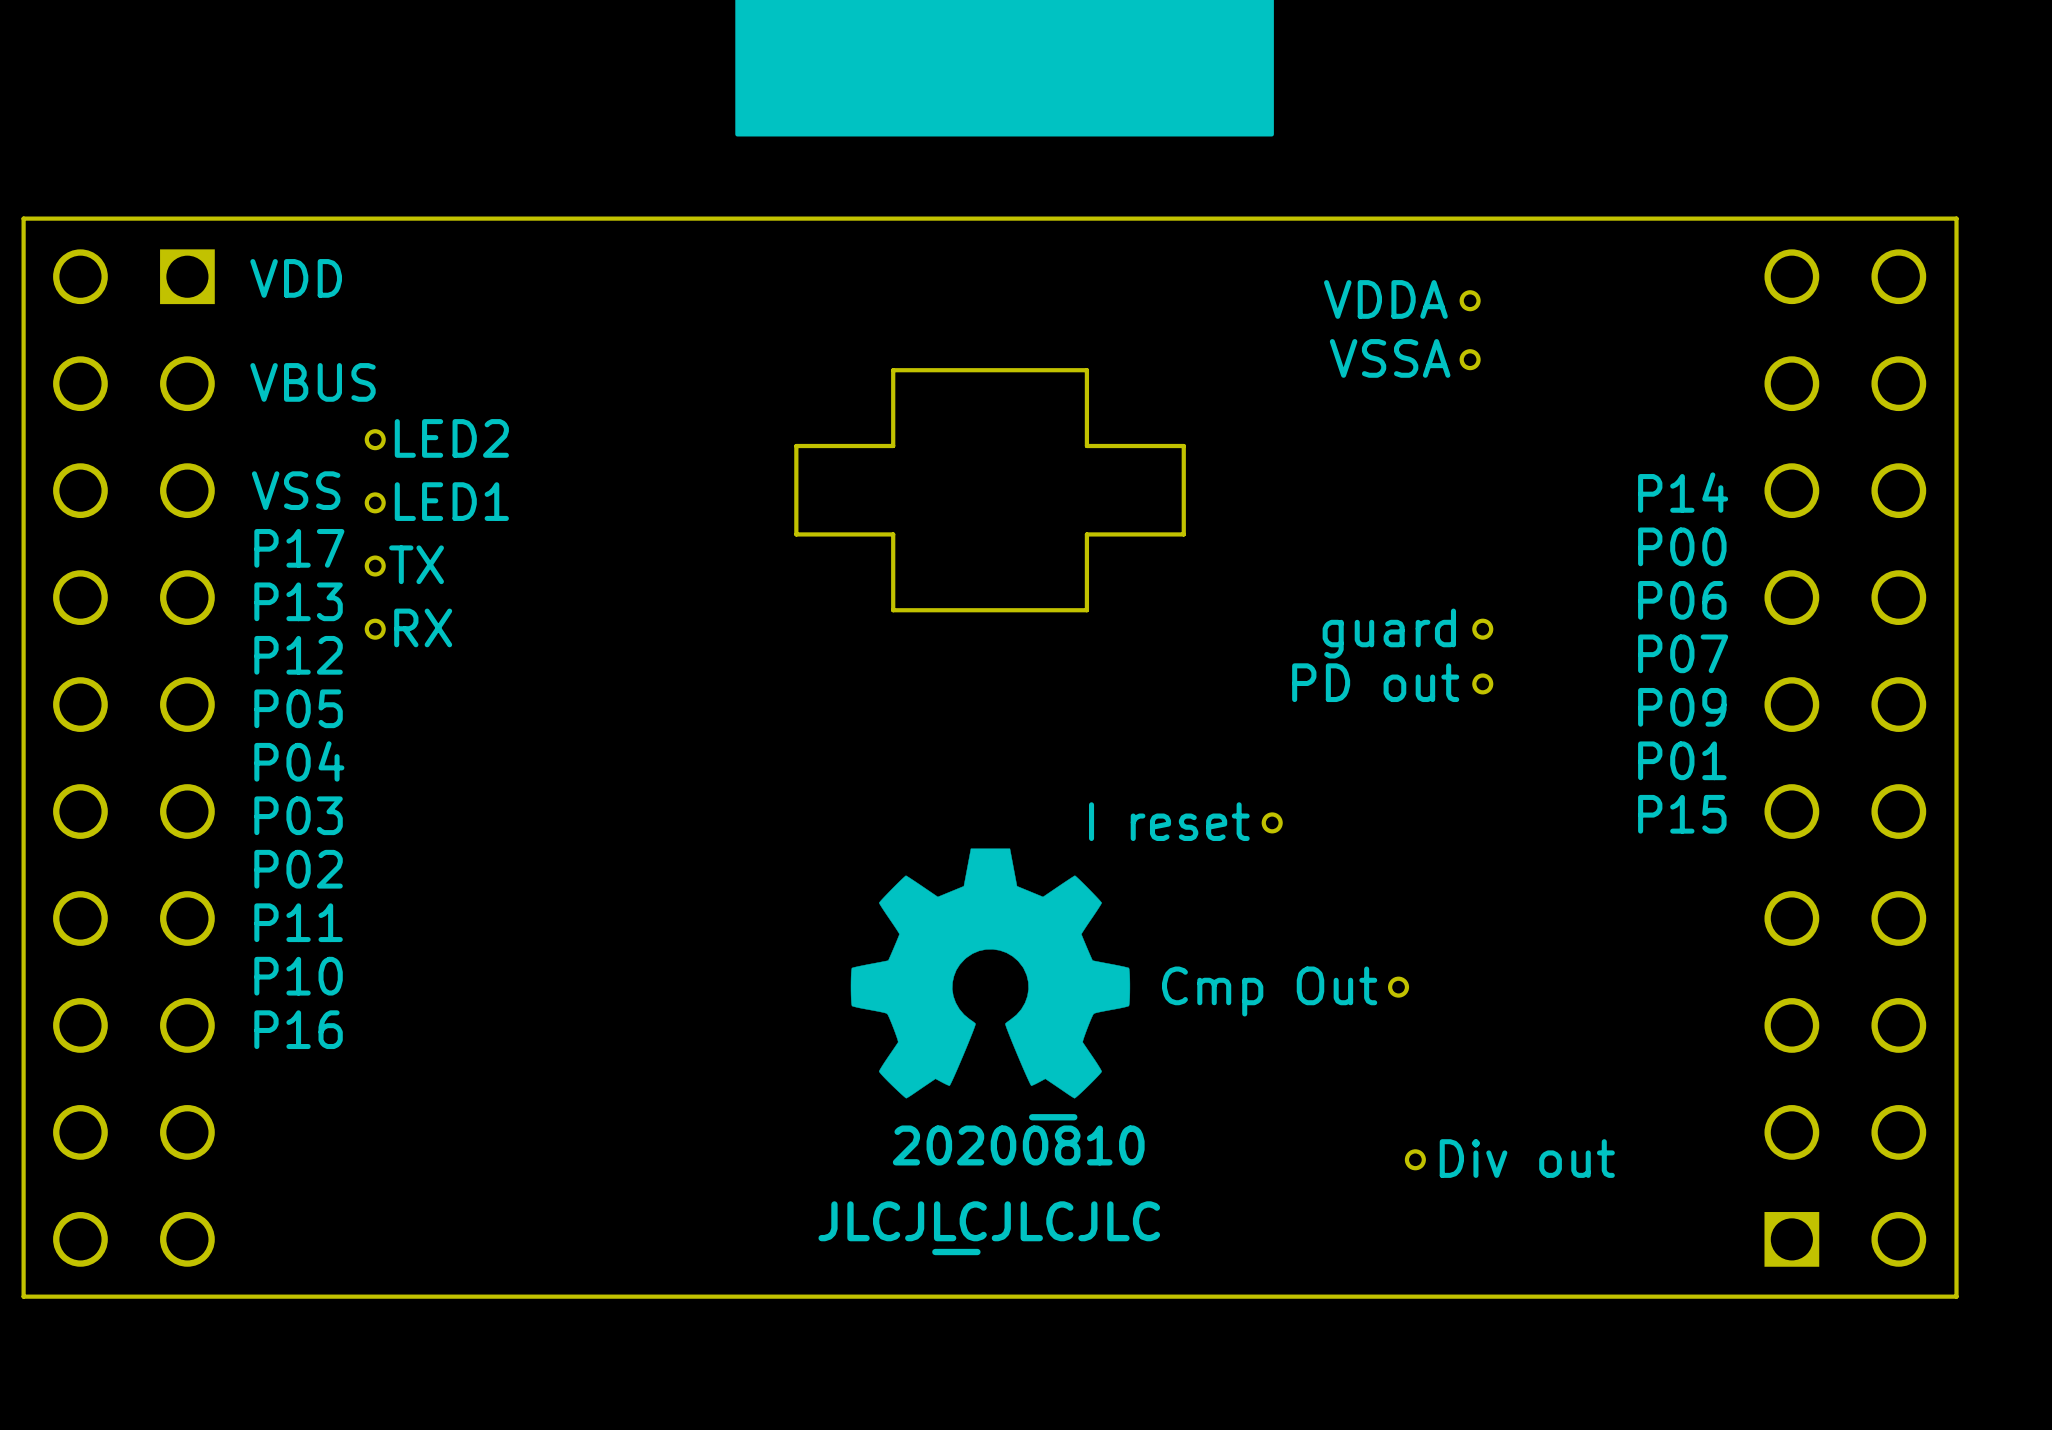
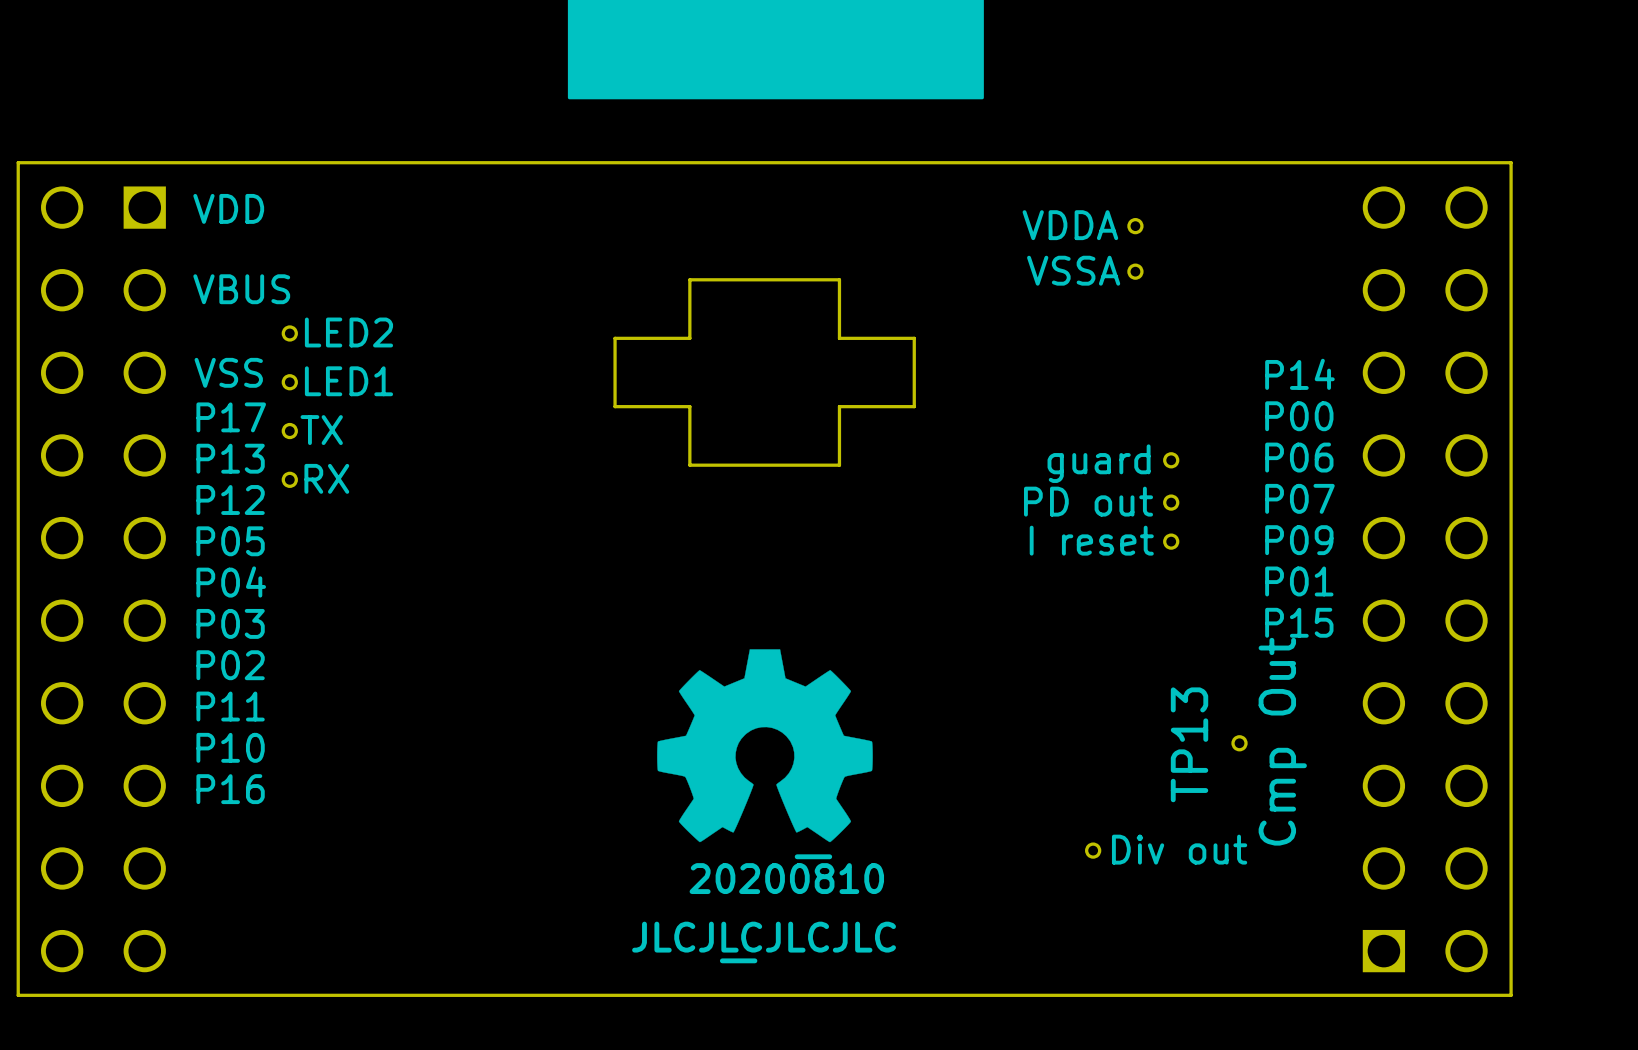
part position: (1482, 629) -> (1171, 460)
part position: (1482, 683) -> (1171, 502)
part position: (1272, 822) -> (1171, 541)
TP13: none -> Cmp Out (1239, 743)
part: Cmp Out (1398, 987) -> none
part position: (1415, 1159) -> (1093, 850)

